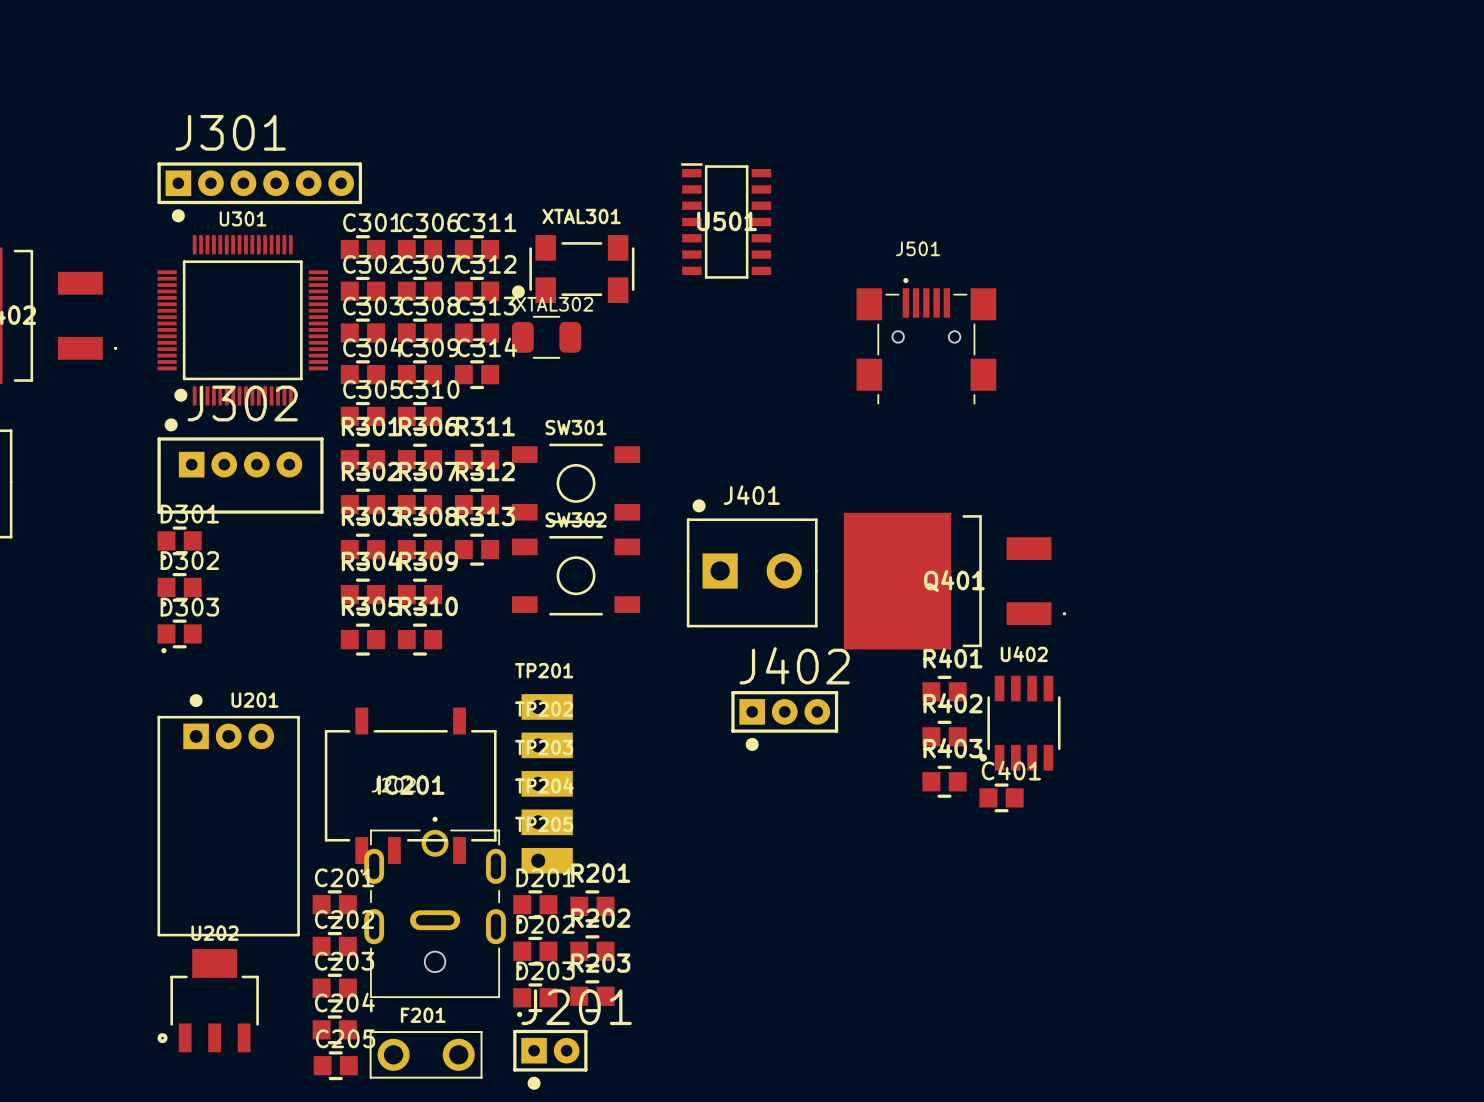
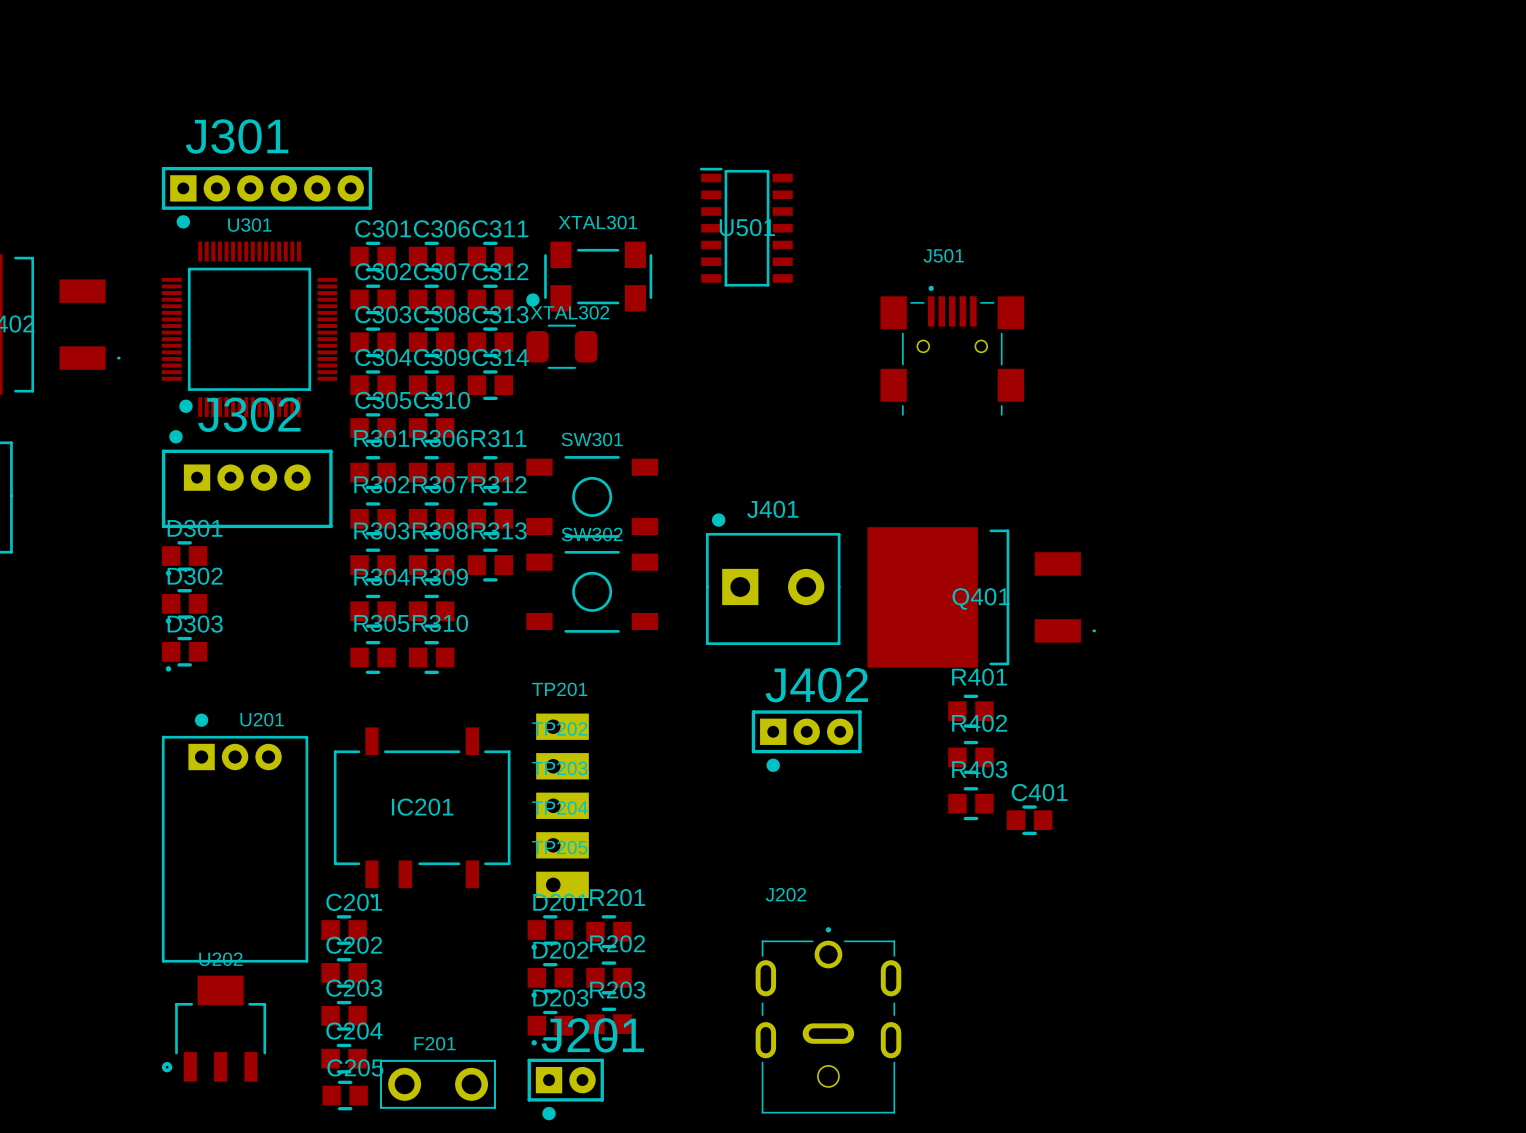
U402: (1020, 723) -> none
J202 position: (435, 907) -> (828, 1020)

